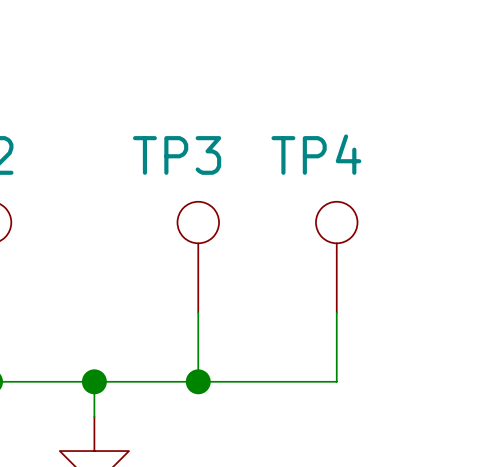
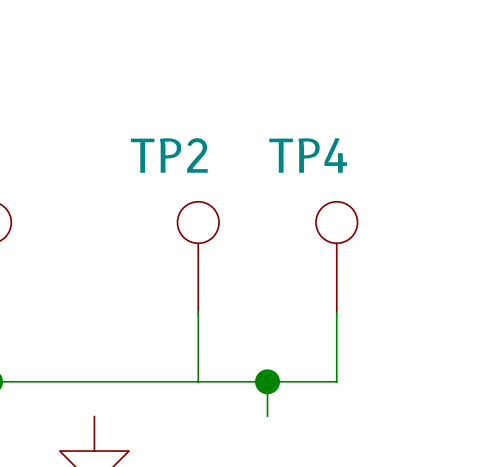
TP3 name: TP3 (177, 155) -> TP2 (169, 155)
wire: (94, 381) (94, 416) -> (267, 381) (267, 416)
junction: (94, 381) -> none
junction position: (198, 381) -> (267, 381)

